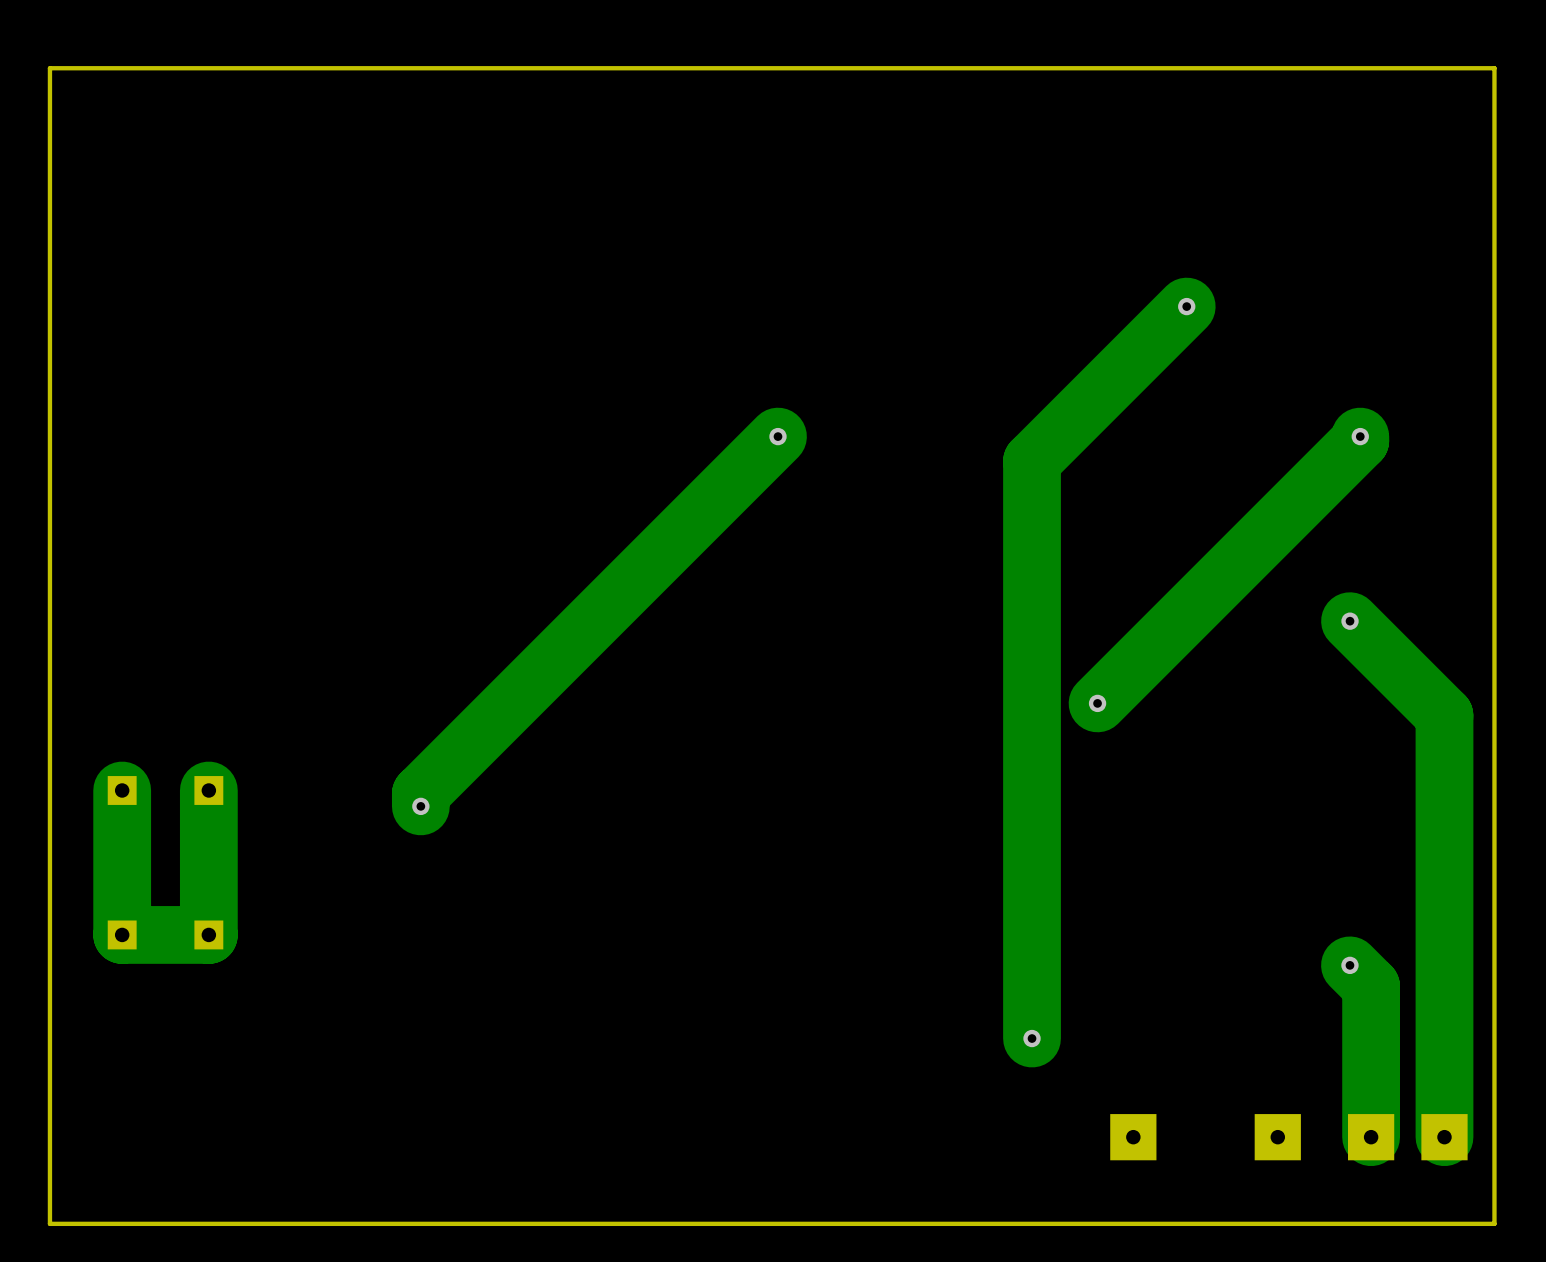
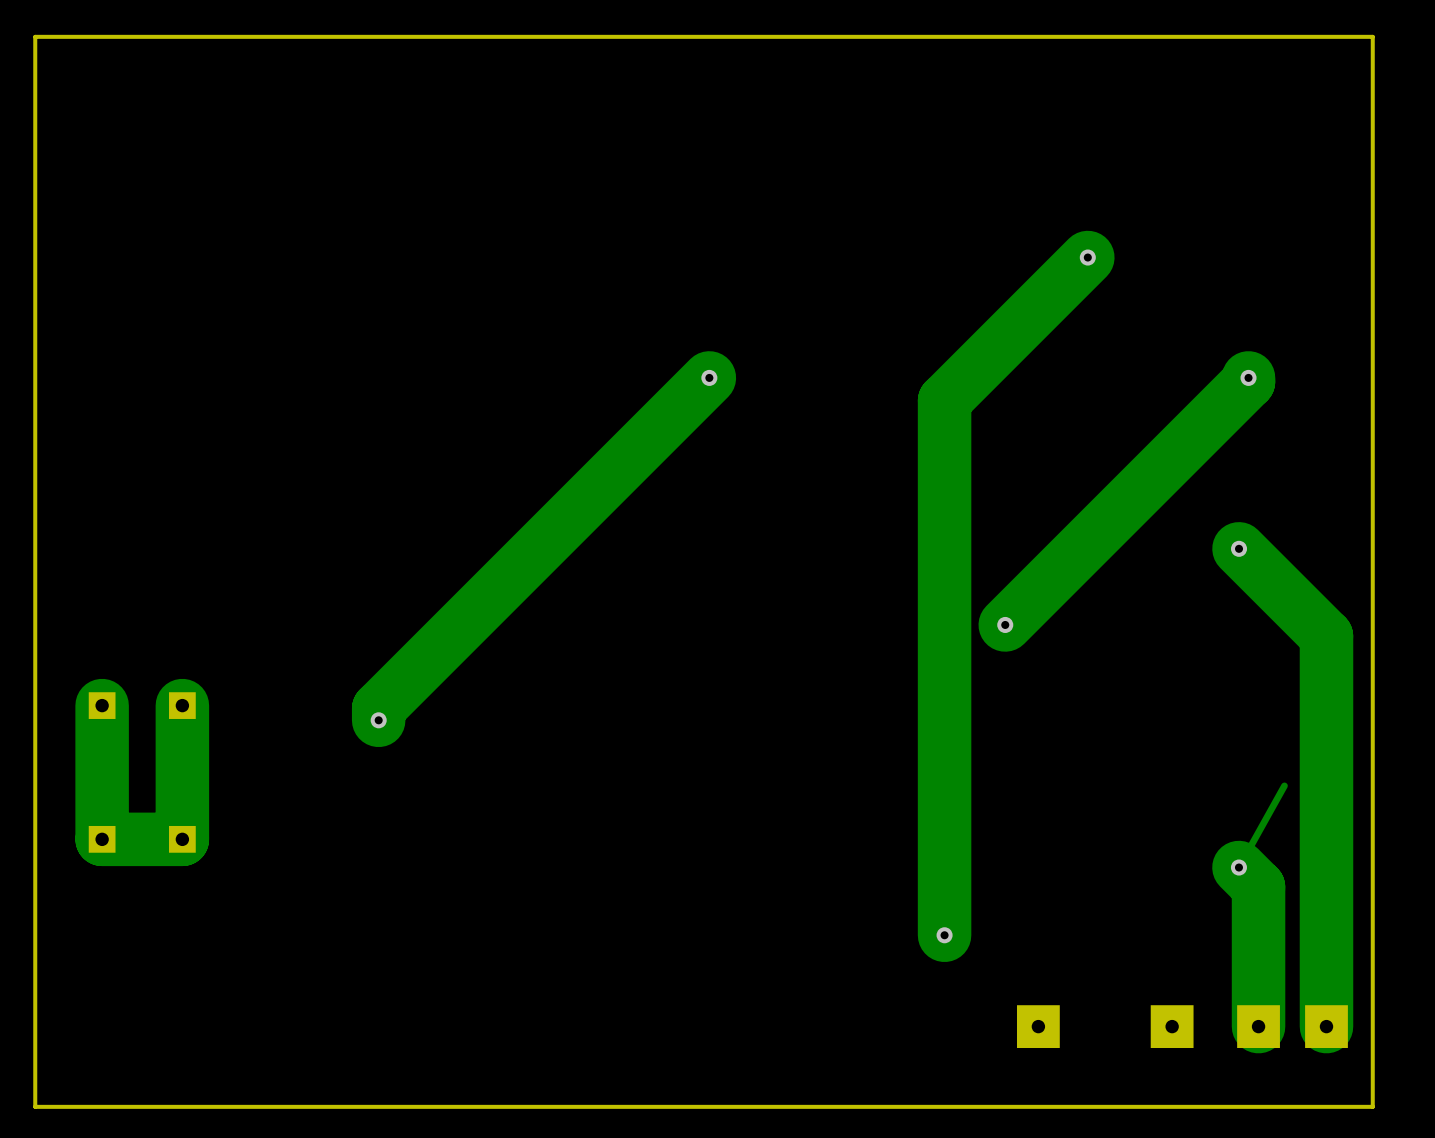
track: none -> (1284, 785) (1239, 867)

